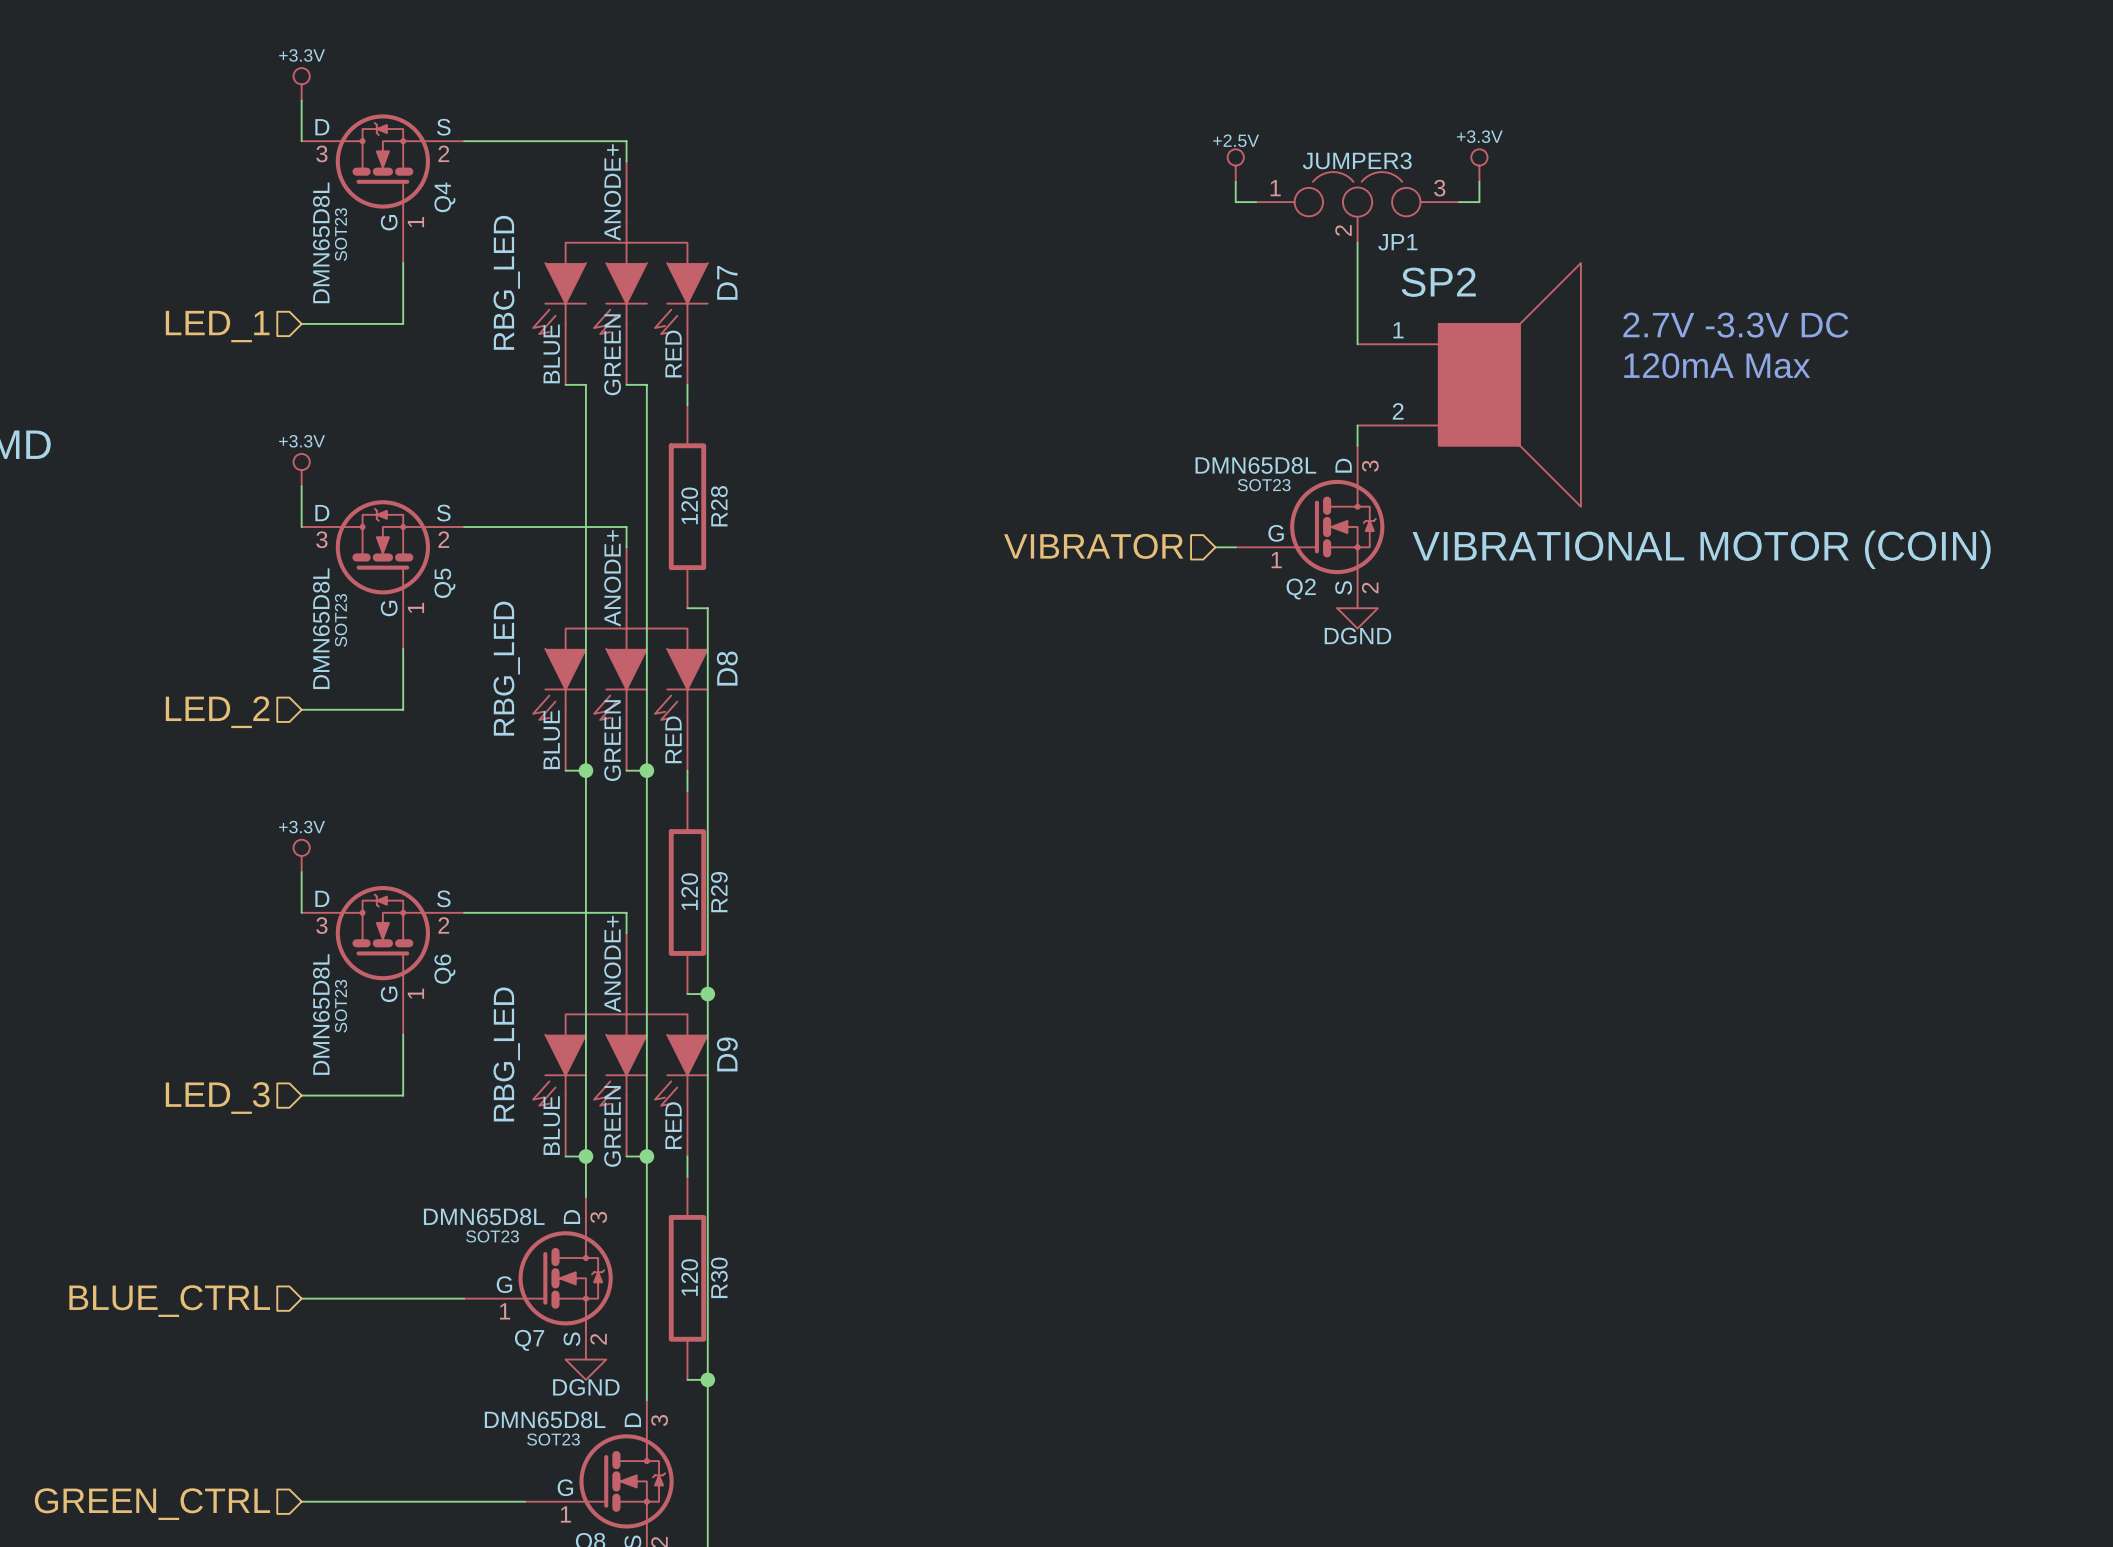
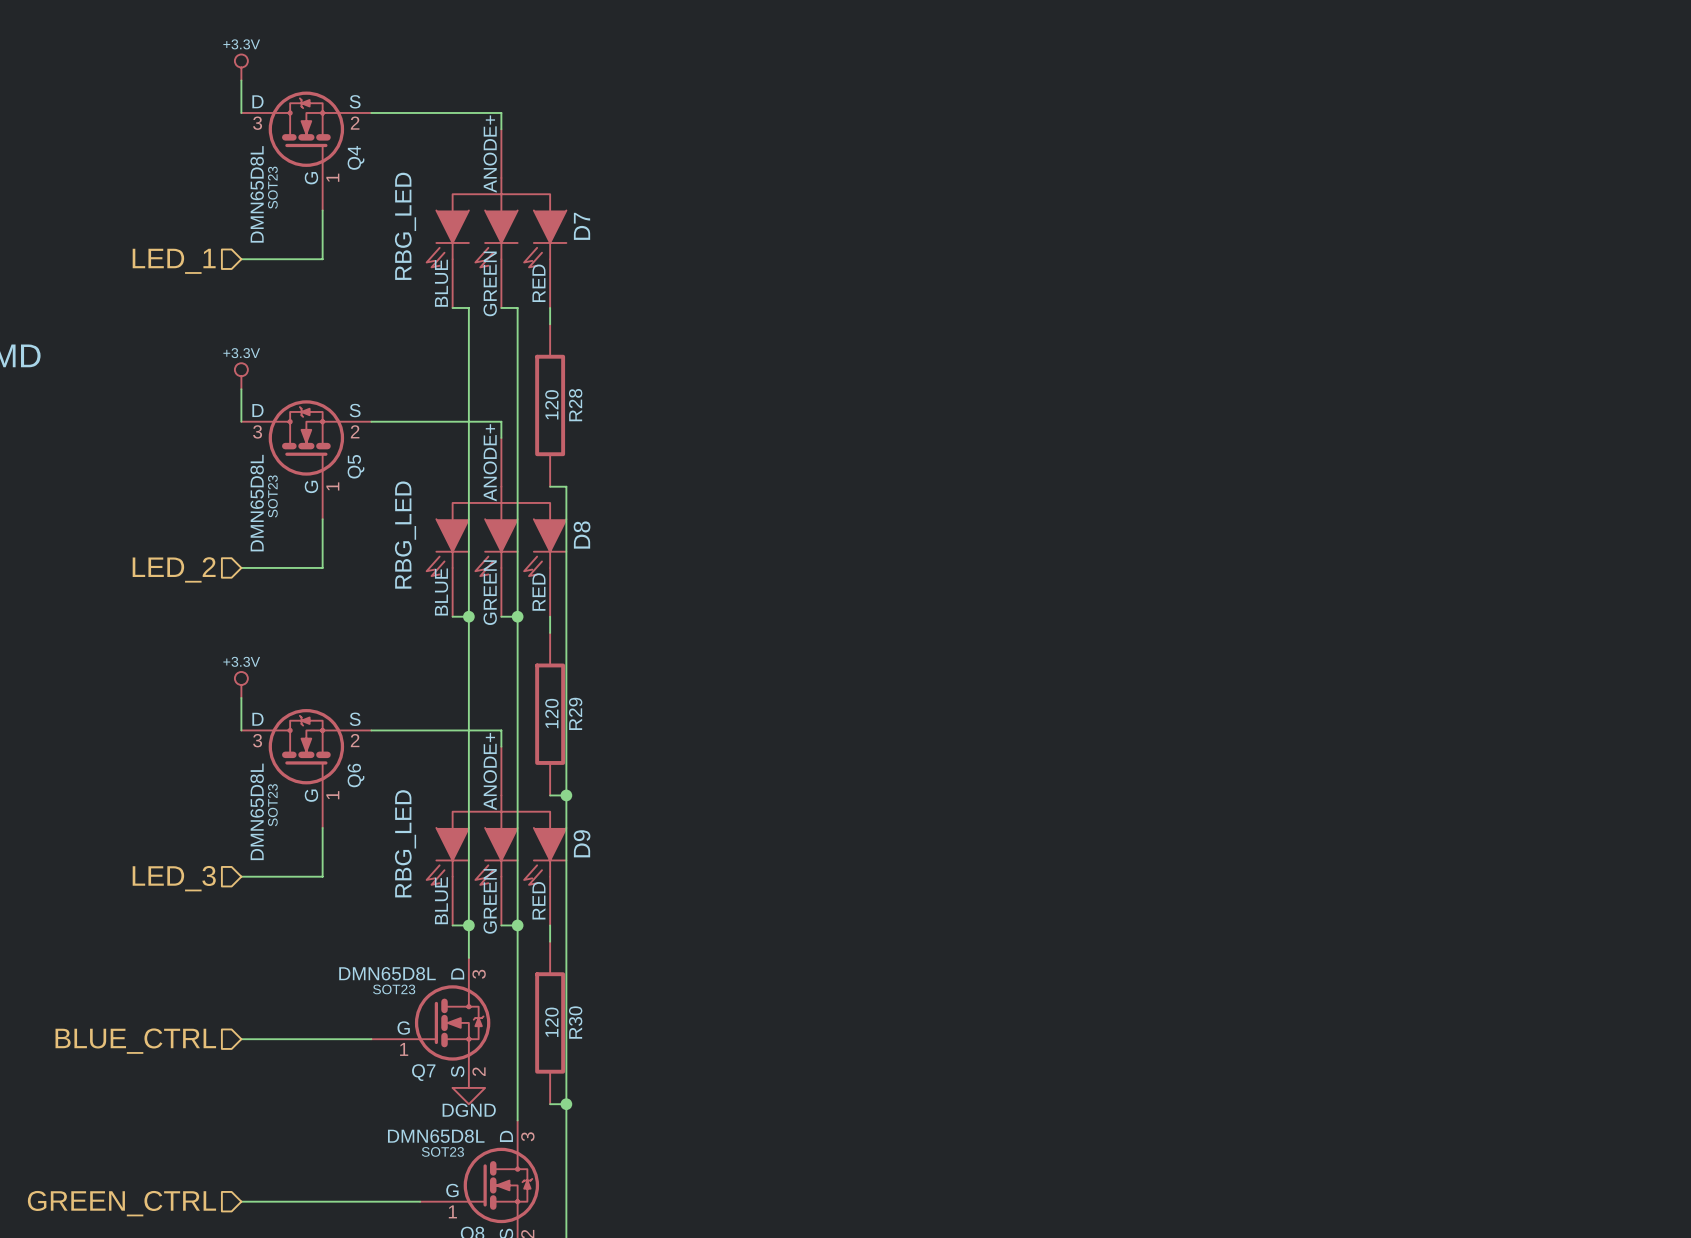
power symbol: +2.5V (1235, 165) -> none
power symbol: +3.3V (1479, 165) -> none
wire: (1235, 181) (1235, 202) (1256, 202) -> none
wire: (1479, 181) (1479, 202) (1459, 202) -> none
JP1: JUMPER3 (1357, 207) -> none
wire: (1357, 242) (1357, 344) -> none
text: 2.7V -3.3V DC (1735, 325) -> none
text: 120mA Max (1717, 365) -> none
SP2: VIBRATIONAL MOTOR (COIN) (1469, 384) -> none
wire: (1357, 425) (1357, 445) -> none
Q2: DMN65D8L (1310, 527) -> none
hierarchical label: VIBRATOR (1093, 546) -> none
wire: (1215, 547) (1235, 547) -> none
power symbol: DGND (1357, 618) -> none

